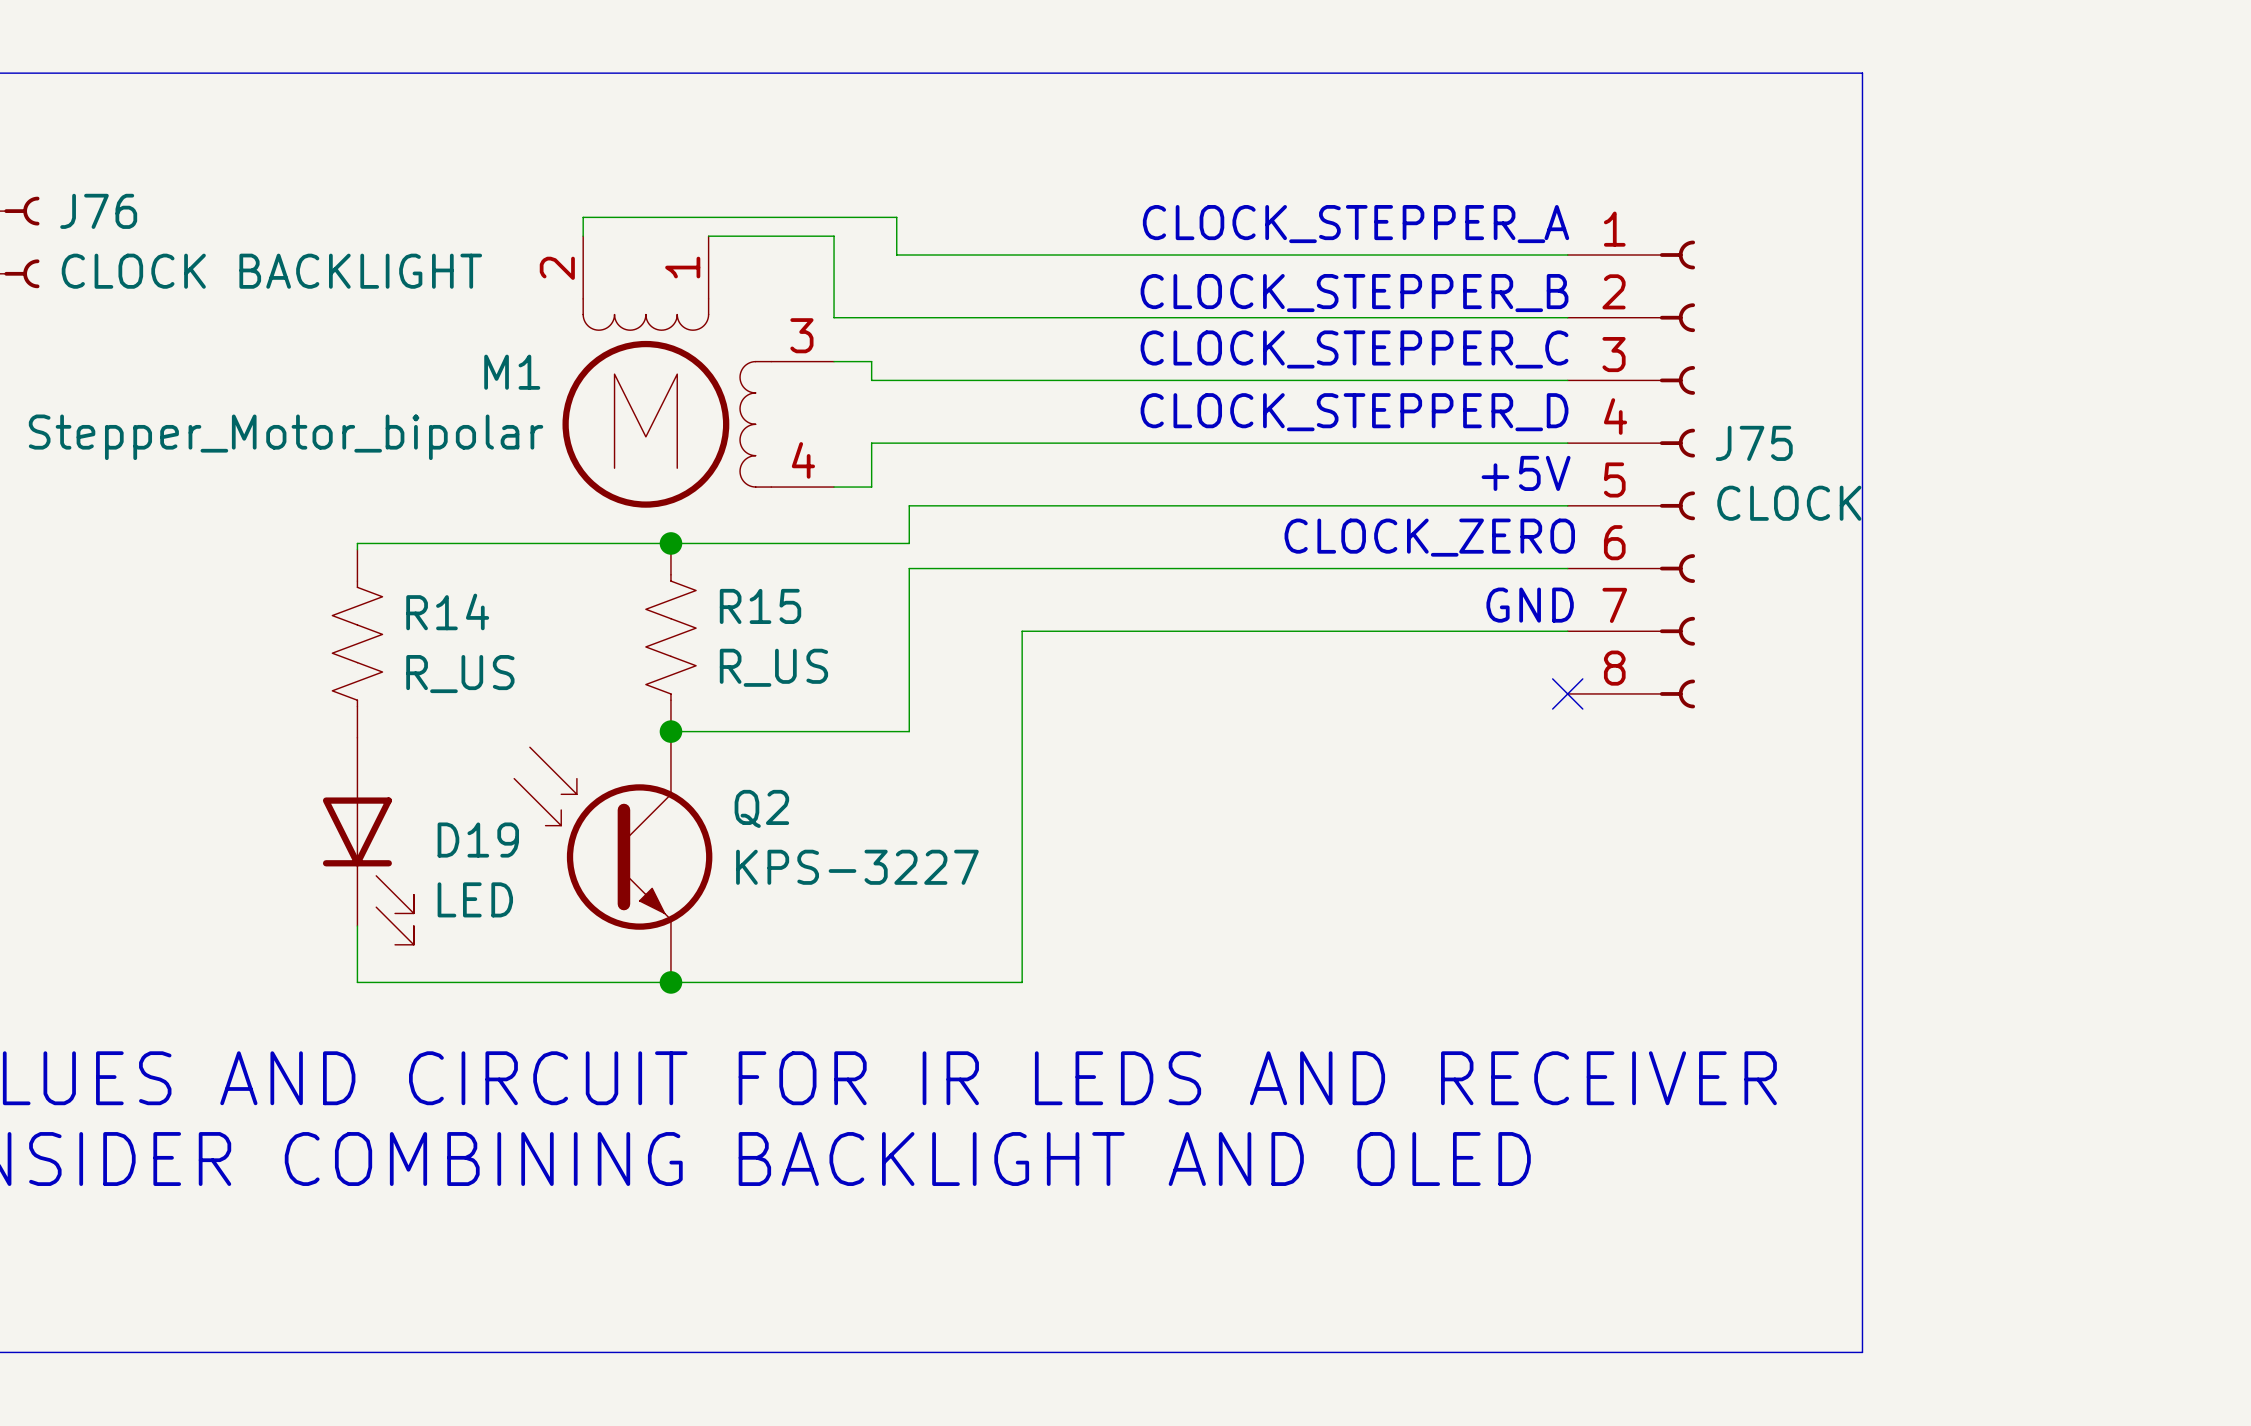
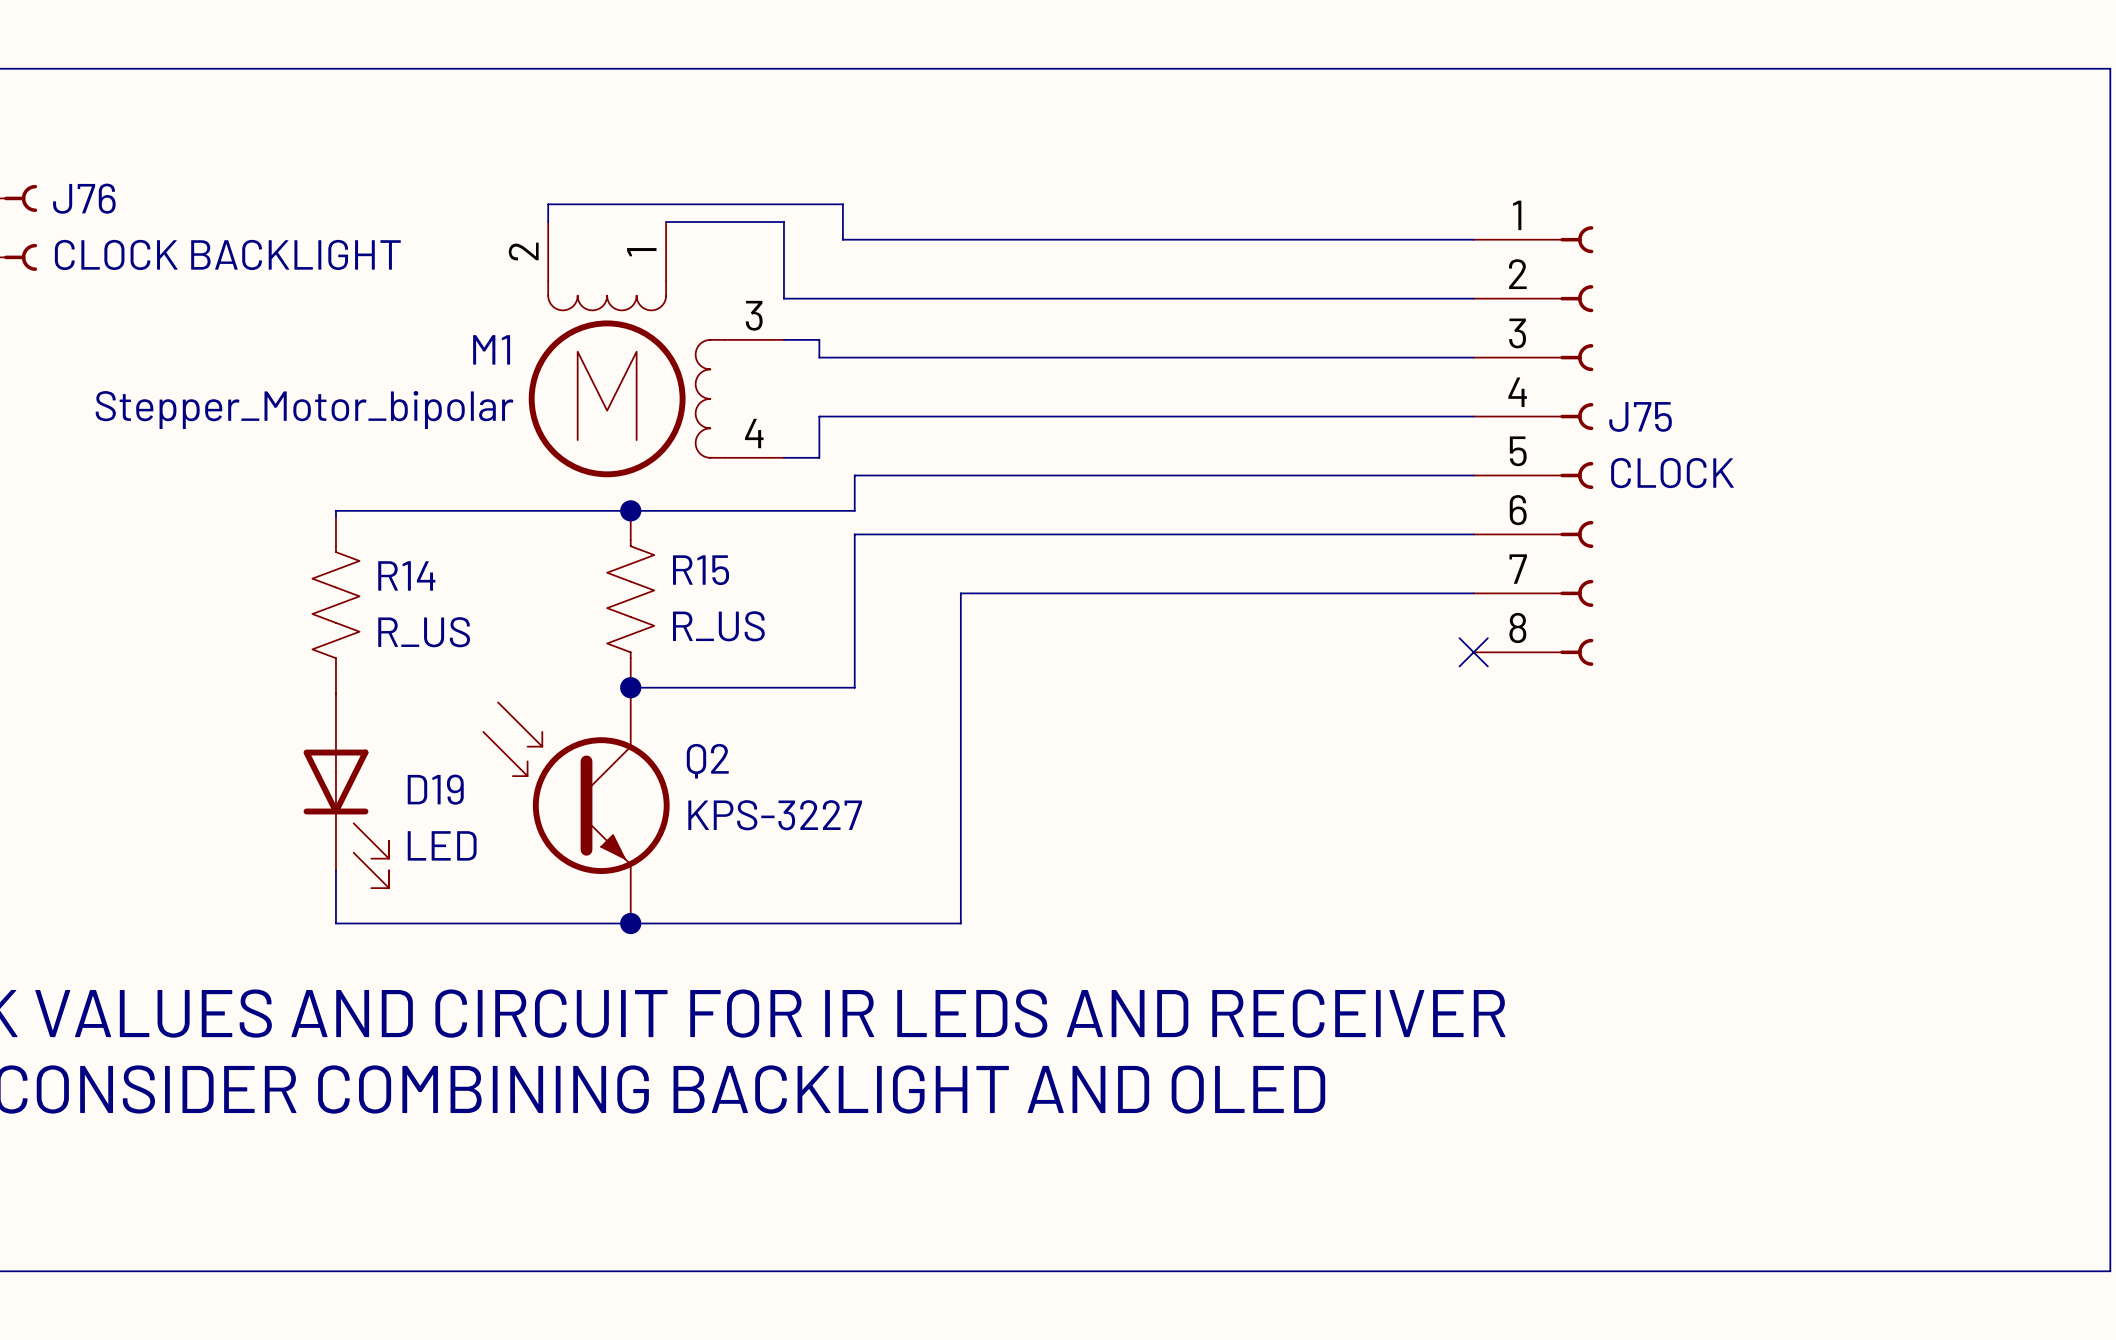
line: (1862, 73) (1862, 1352) -> (1750, 68) (2110, 68) (2110, 1271) (1750, 1271)
text: CLOCK_STEPPER_A (1356, 224) -> none
text: CLOCK_STEPPER_B (1354, 293) -> none
text: CLOCK_STEPPER_C (1354, 349) -> none
text: CLOCK_STEPPER_D (1354, 412) -> none
text: +5V (1526, 473) -> none
text: CLOCK_ZERO (1429, 537) -> none
text: GND (1530, 605) -> none

